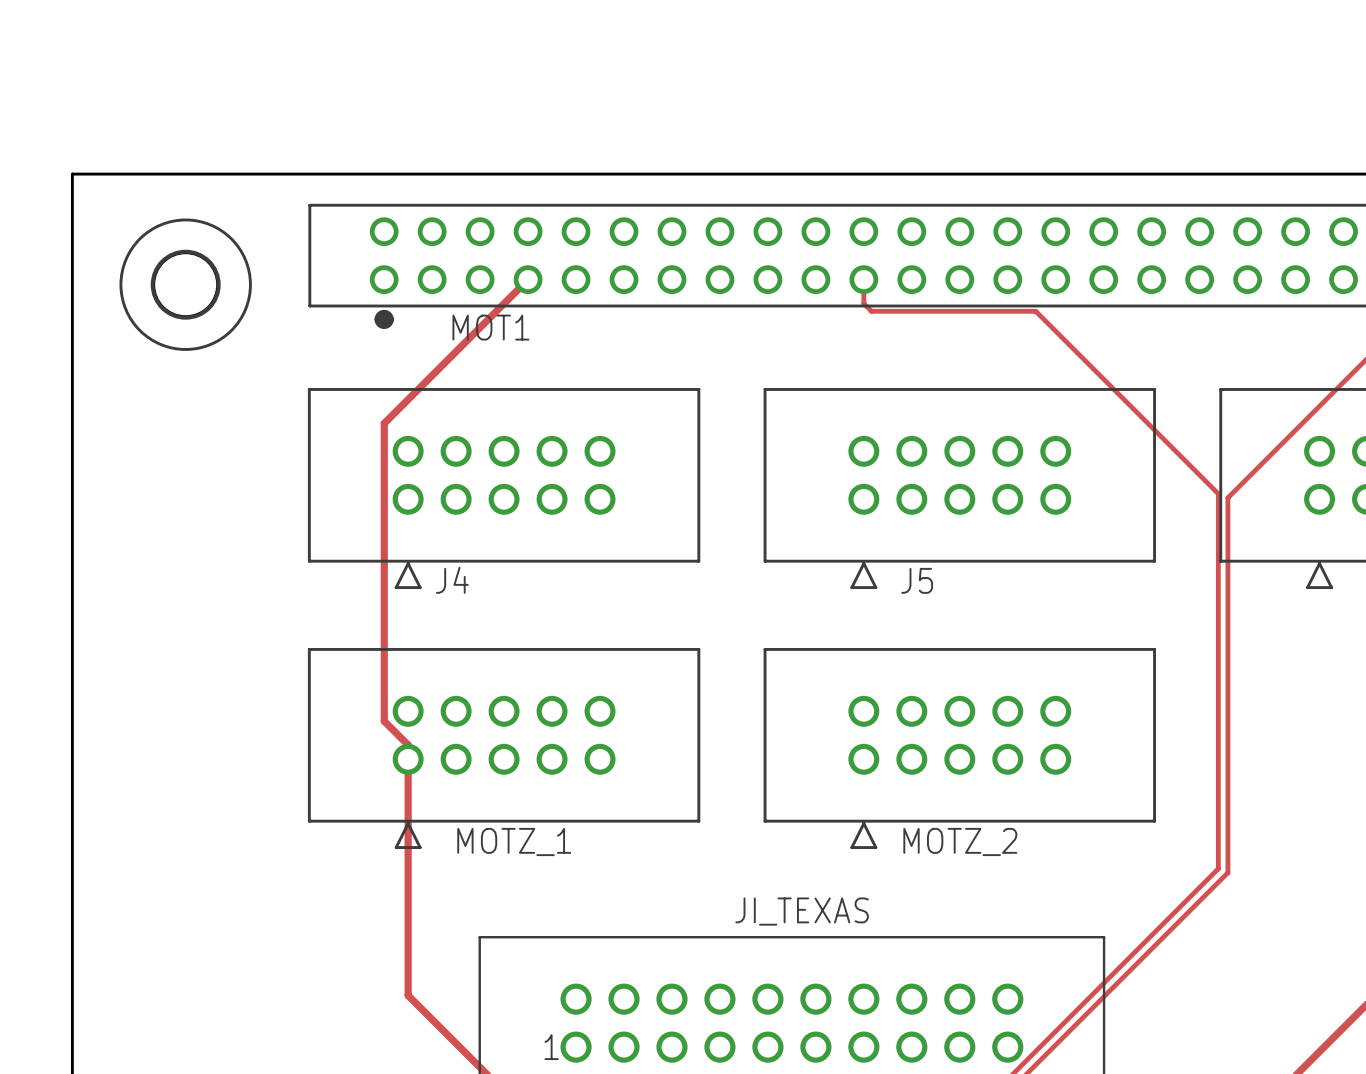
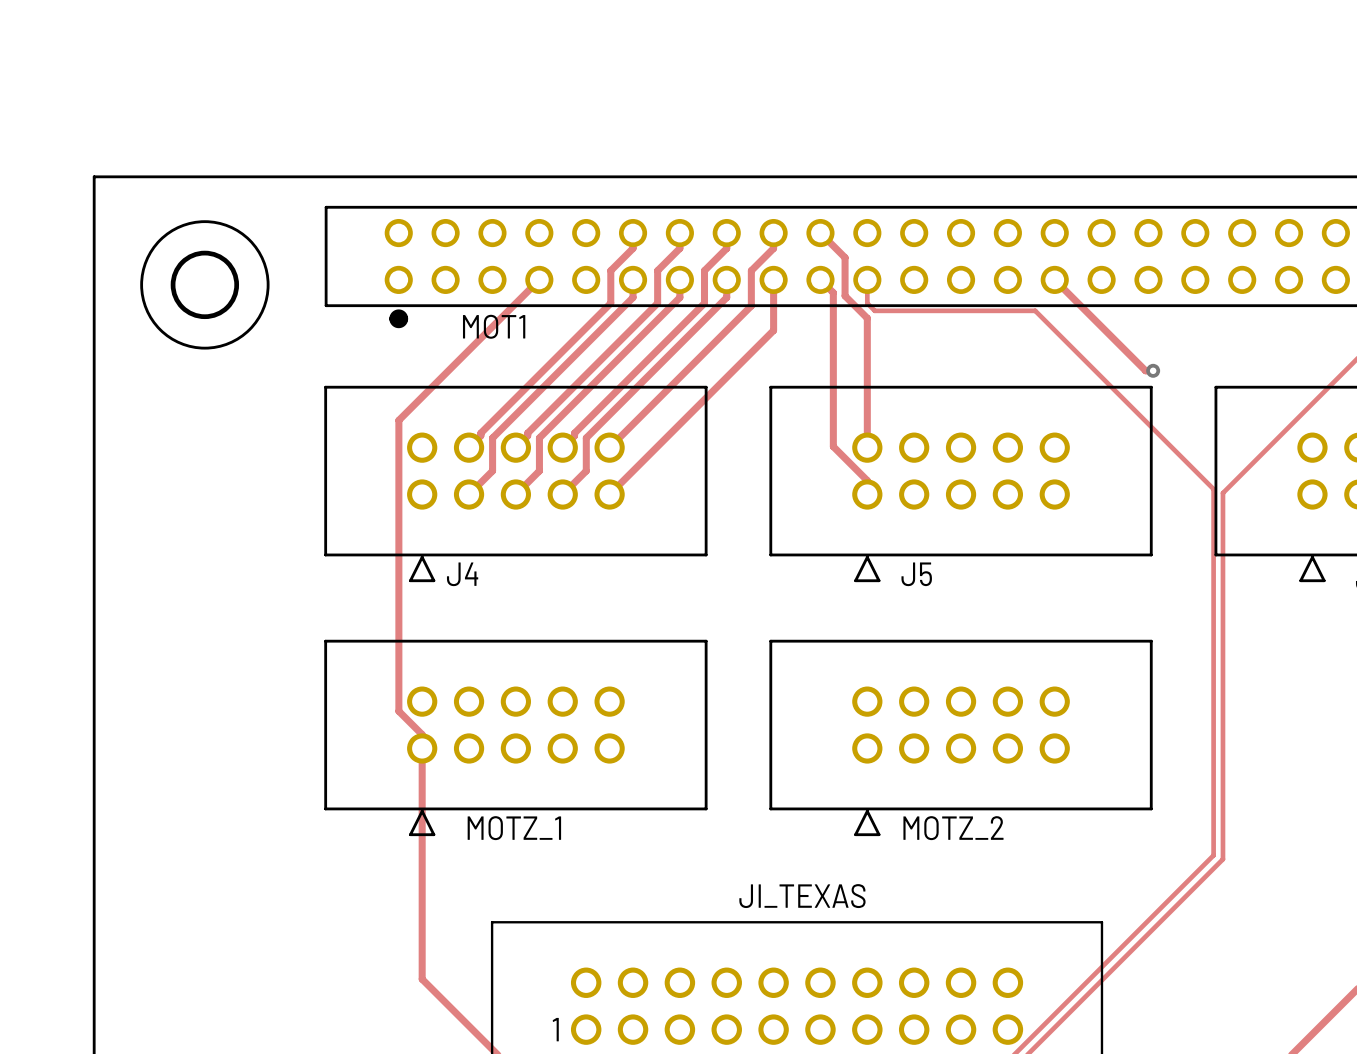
track: none -> (633, 233) (633, 248) (610, 270) (610, 303) (480, 433) (480, 435) (469, 447)
track: none -> (679, 233) (679, 248) (657, 270) (657, 303) (527, 433) (527, 435) (515, 447)
track: none -> (726, 233) (726, 248) (704, 270) (704, 303) (574, 433) (574, 435) (562, 447)
track: none -> (773, 233) (773, 248) (751, 270) (751, 305) (609, 447)
track: none -> (820, 233) (845, 257) (845, 295) (867, 318) (867, 447)
track: none -> (633, 279) (633, 297) (492, 438) (492, 470) (469, 494)
track: none -> (679, 279) (679, 297) (539, 438) (539, 470) (515, 494)
track: none -> (726, 279) (726, 297) (586, 438) (586, 470) (562, 494)
track: none -> (773, 279) (773, 330) (609, 494)
track: none -> (820, 279) (833, 292) (833, 446) (867, 480) (867, 494)
track: none -> (1054, 279) (1145, 370) (1153, 370)
via: none -> (1153, 370)

